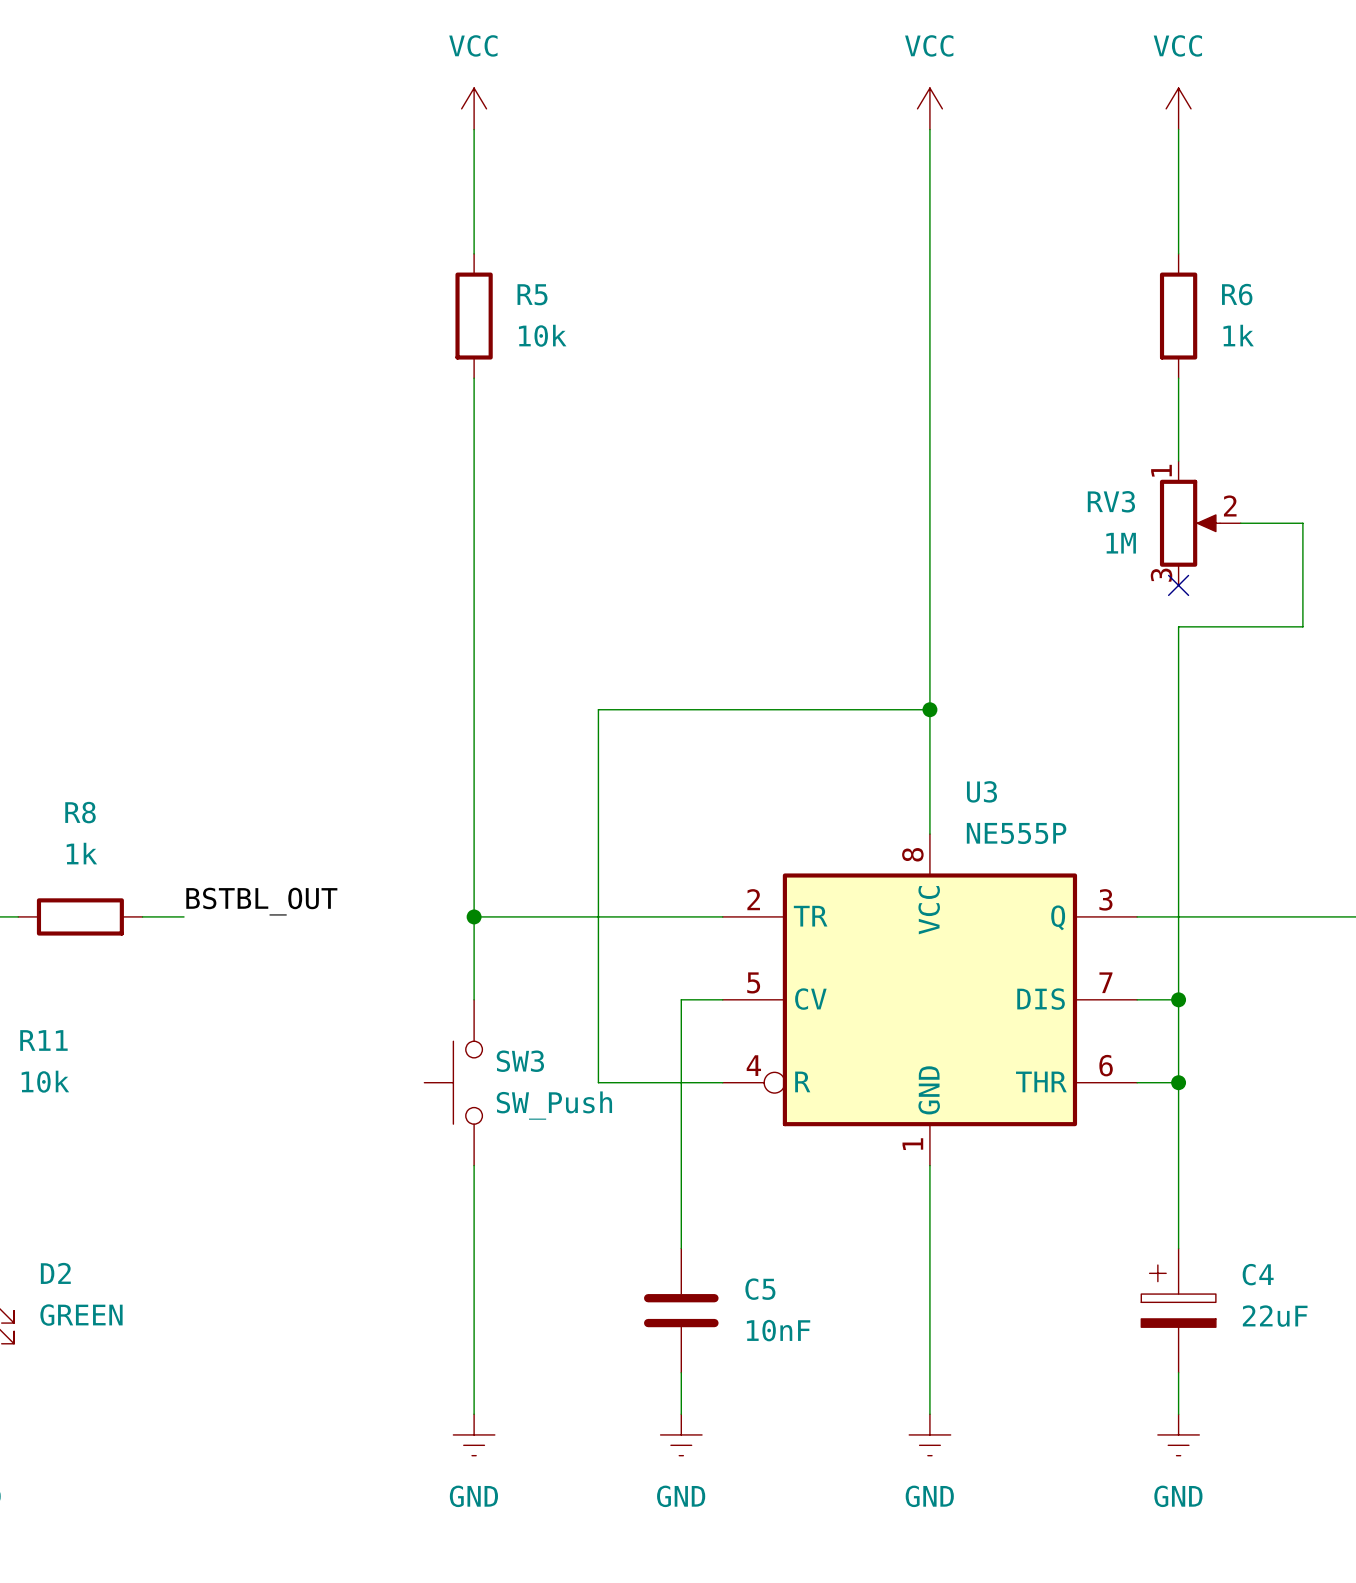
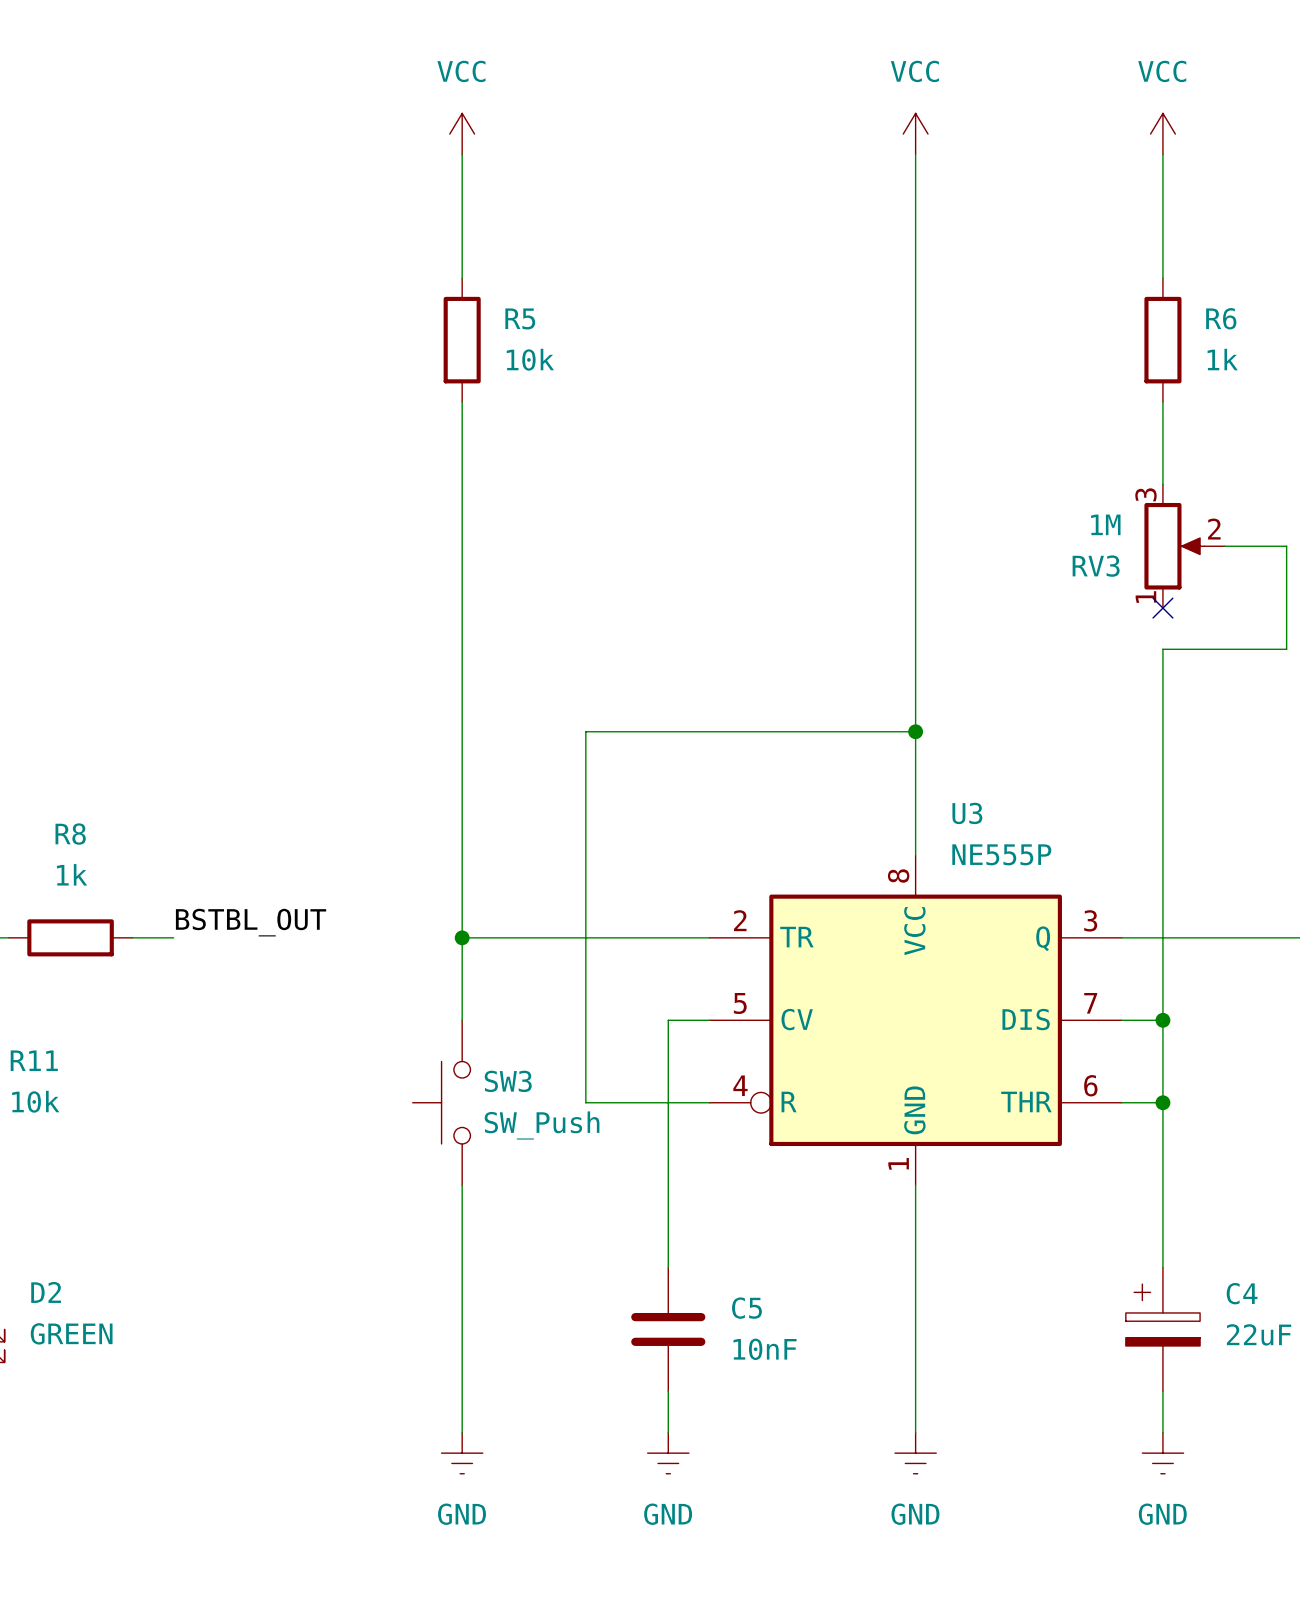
RV3 flip: as is (1189, 523) -> up-down (1174, 546)

